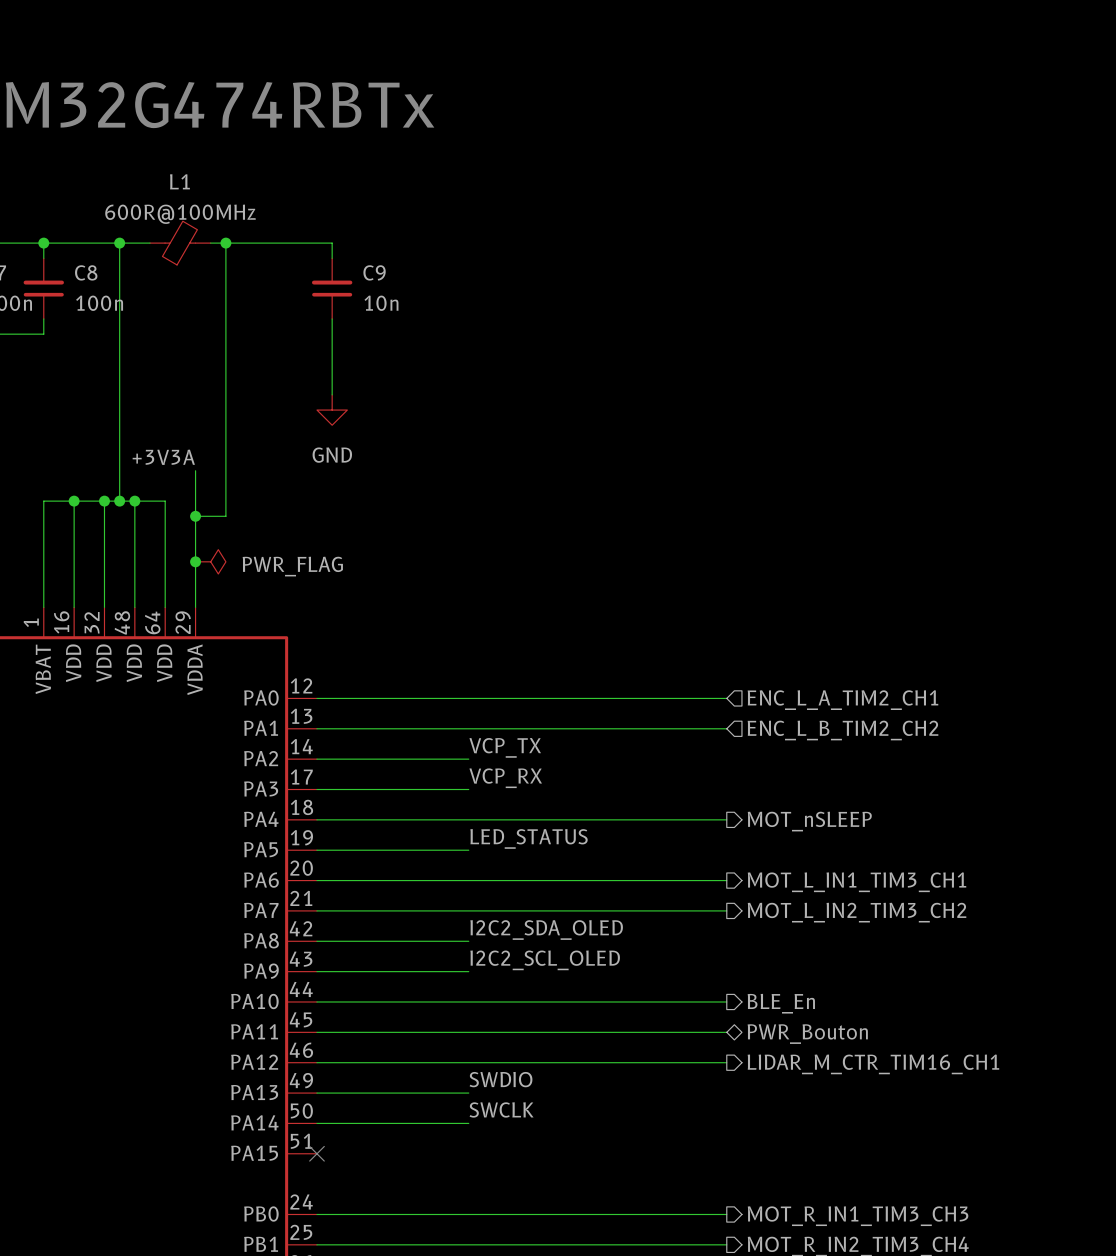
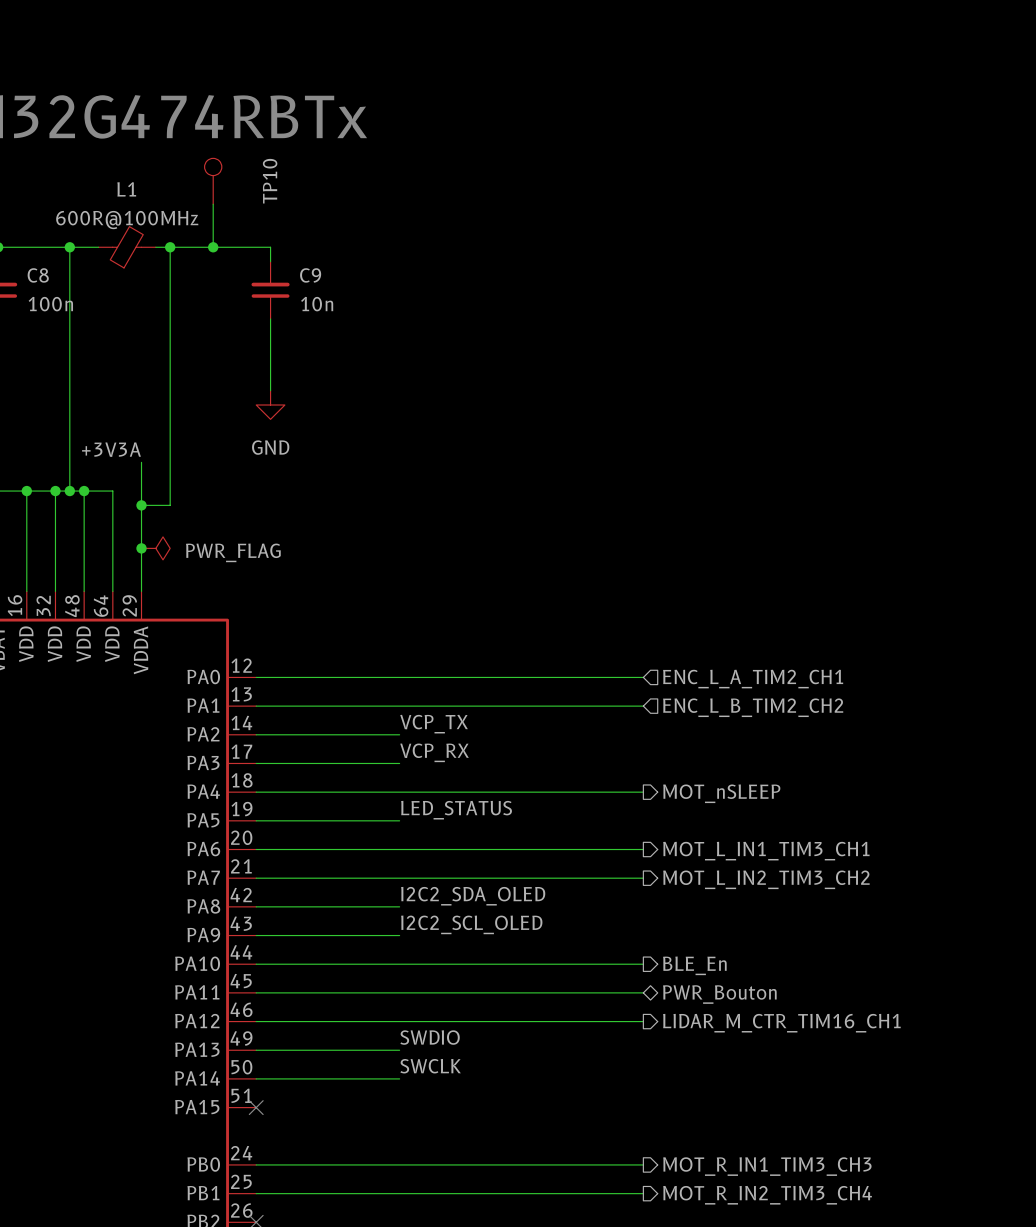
TP10: none -> (213, 181)
wire: none -> (213, 204) (213, 247)
junction: none -> (213, 247)

